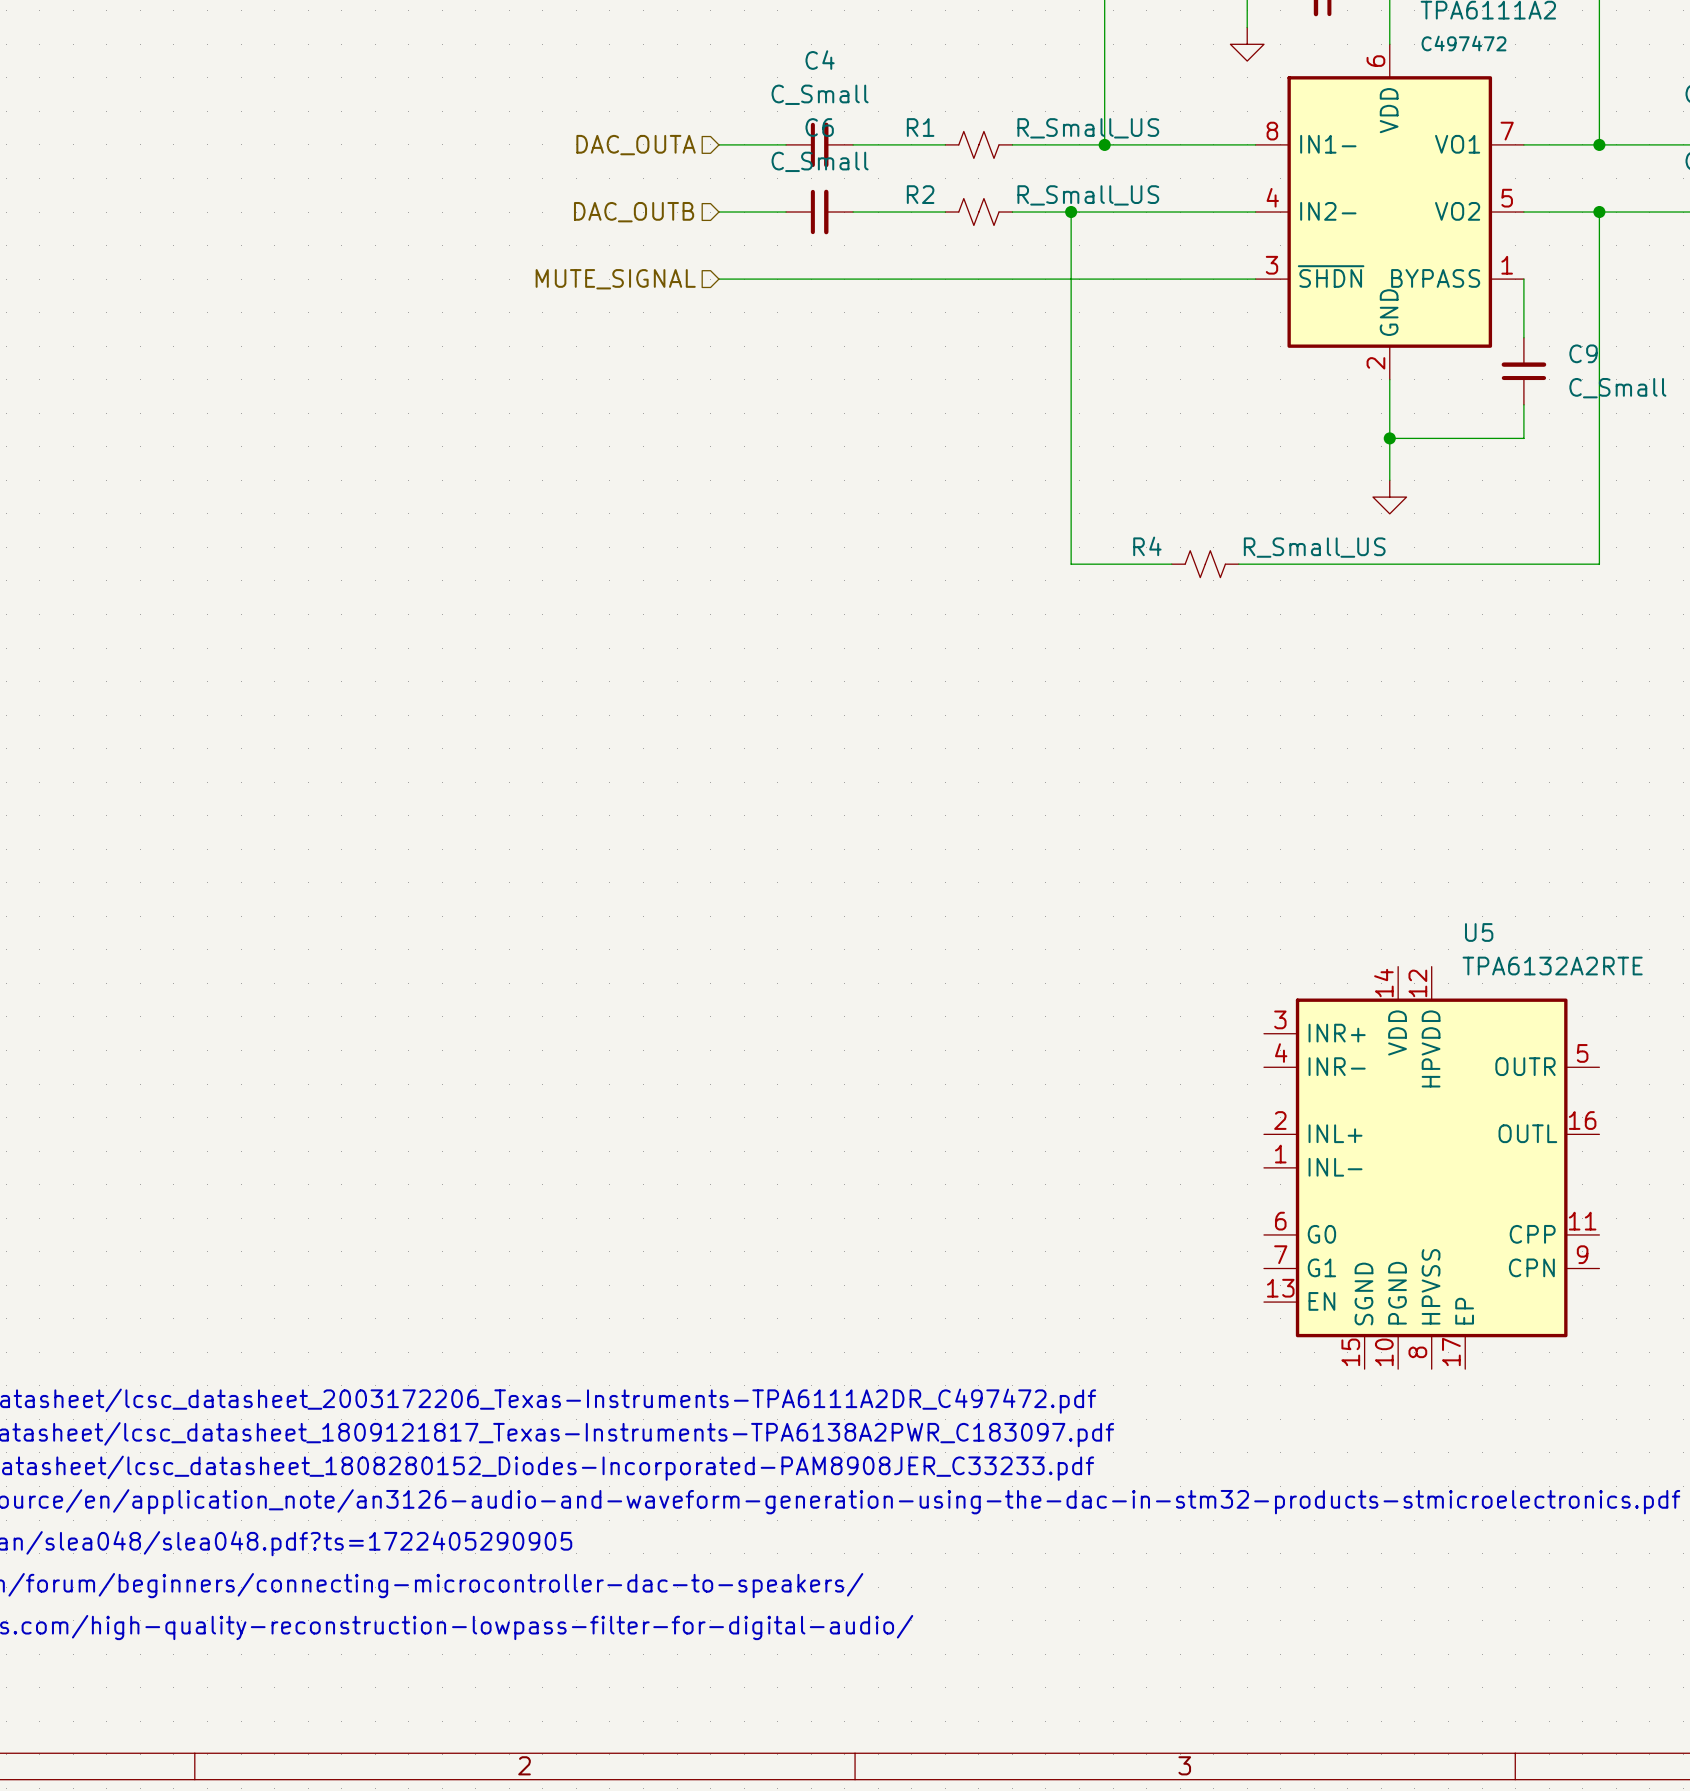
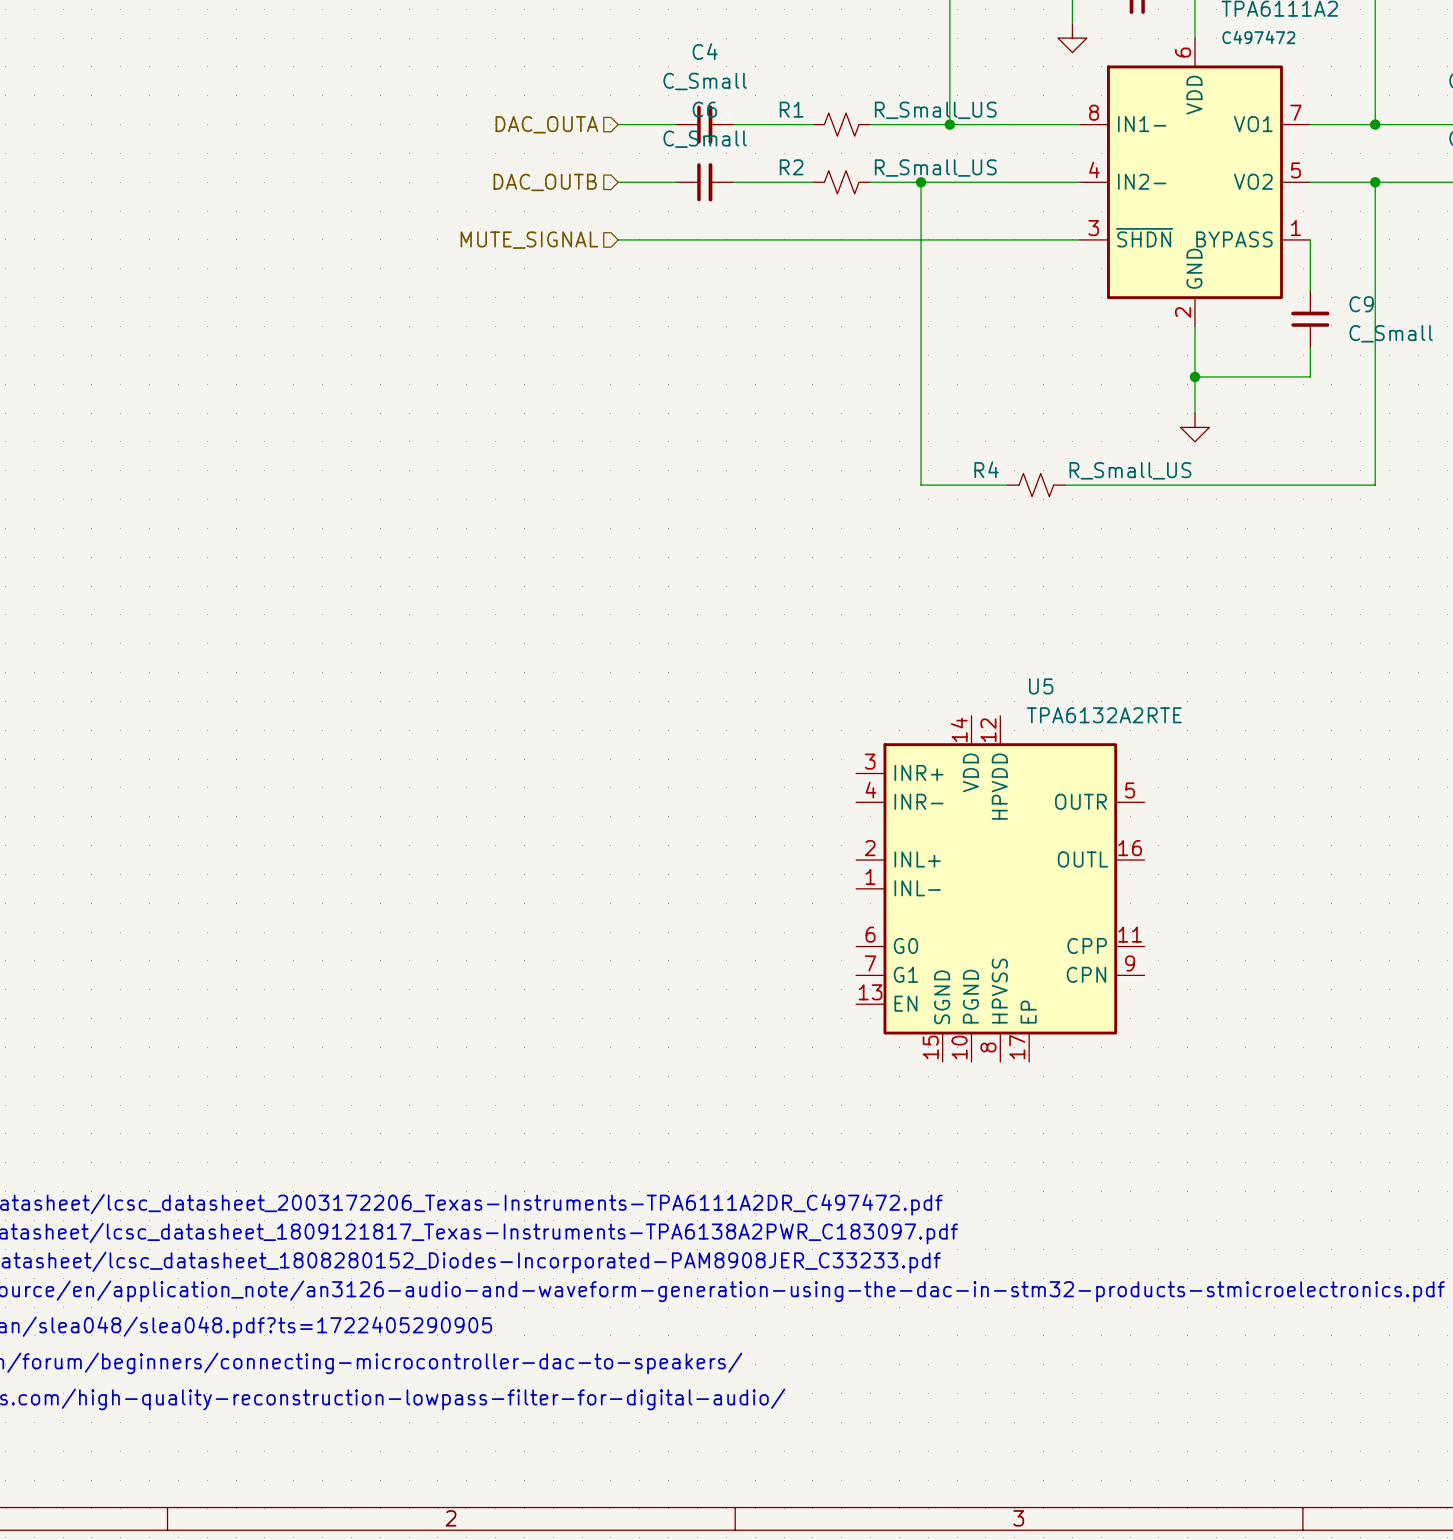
U5 position: (1431, 1167) -> (1000, 888)

